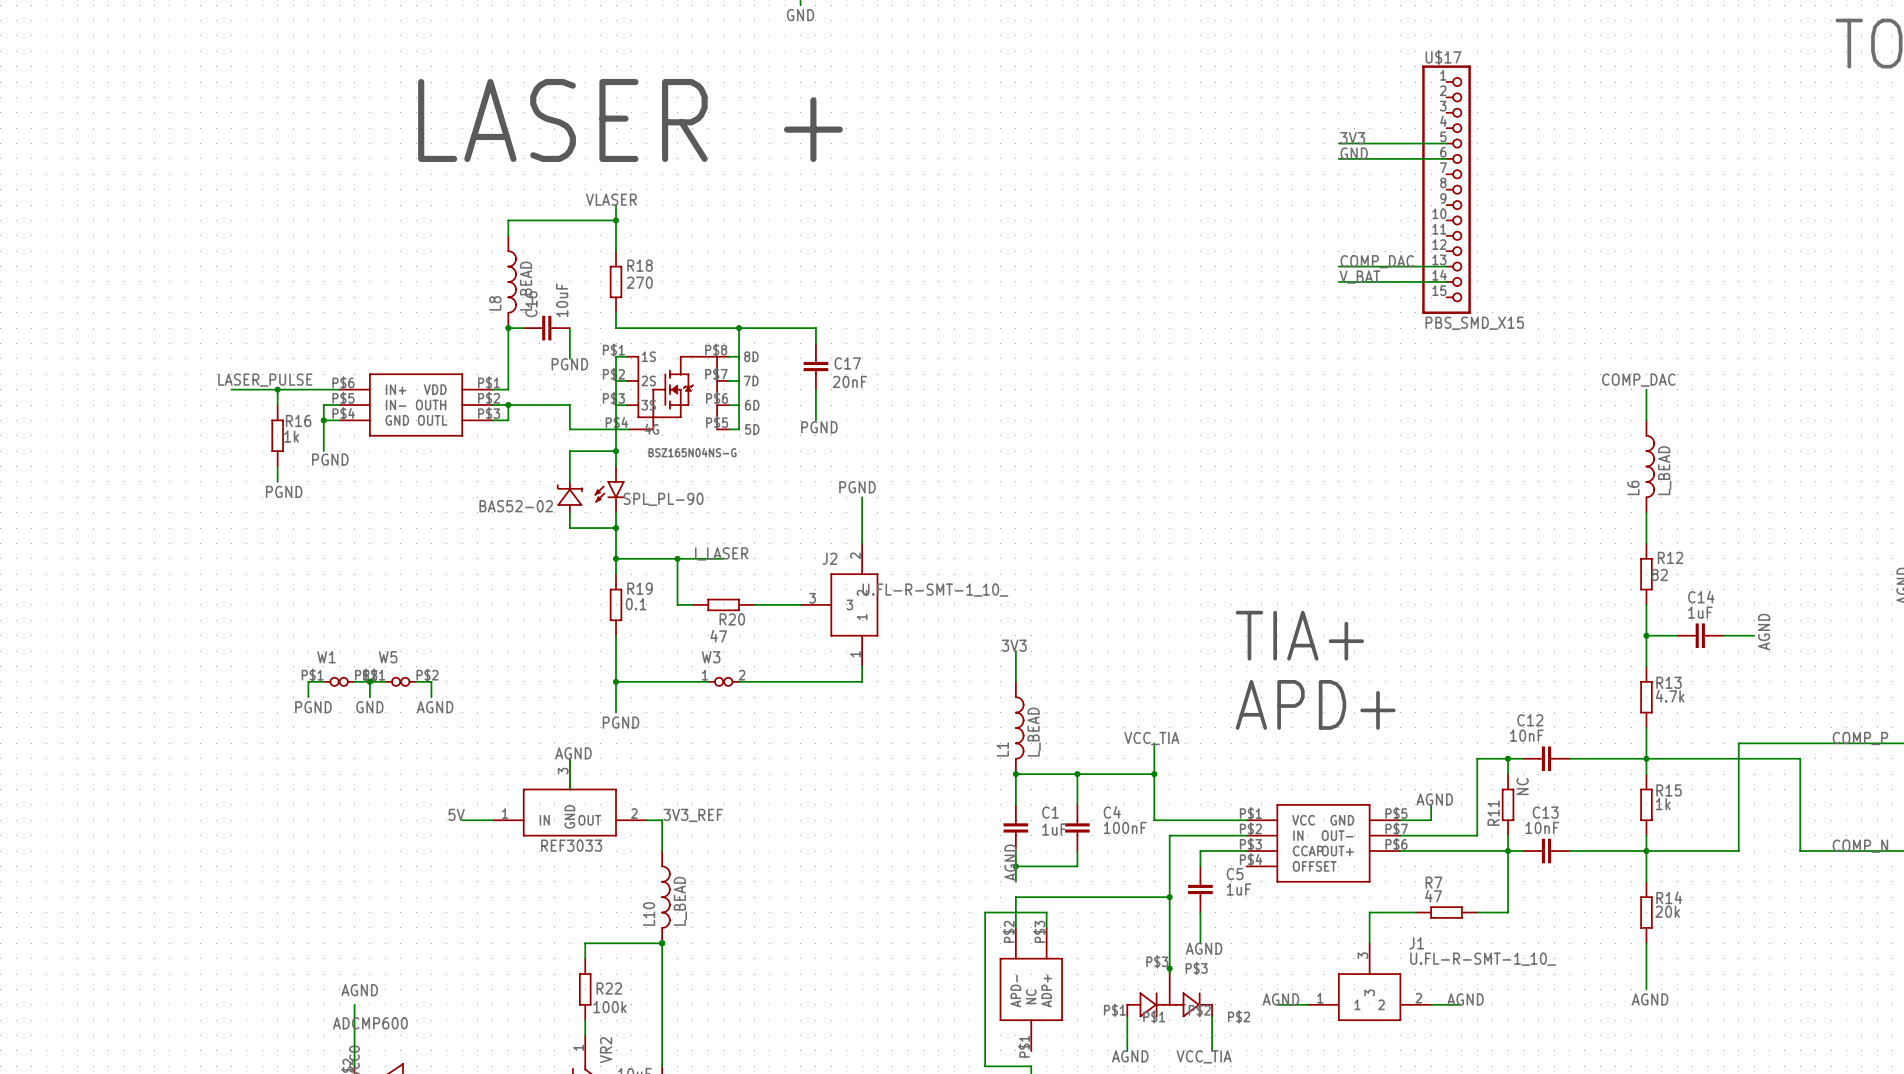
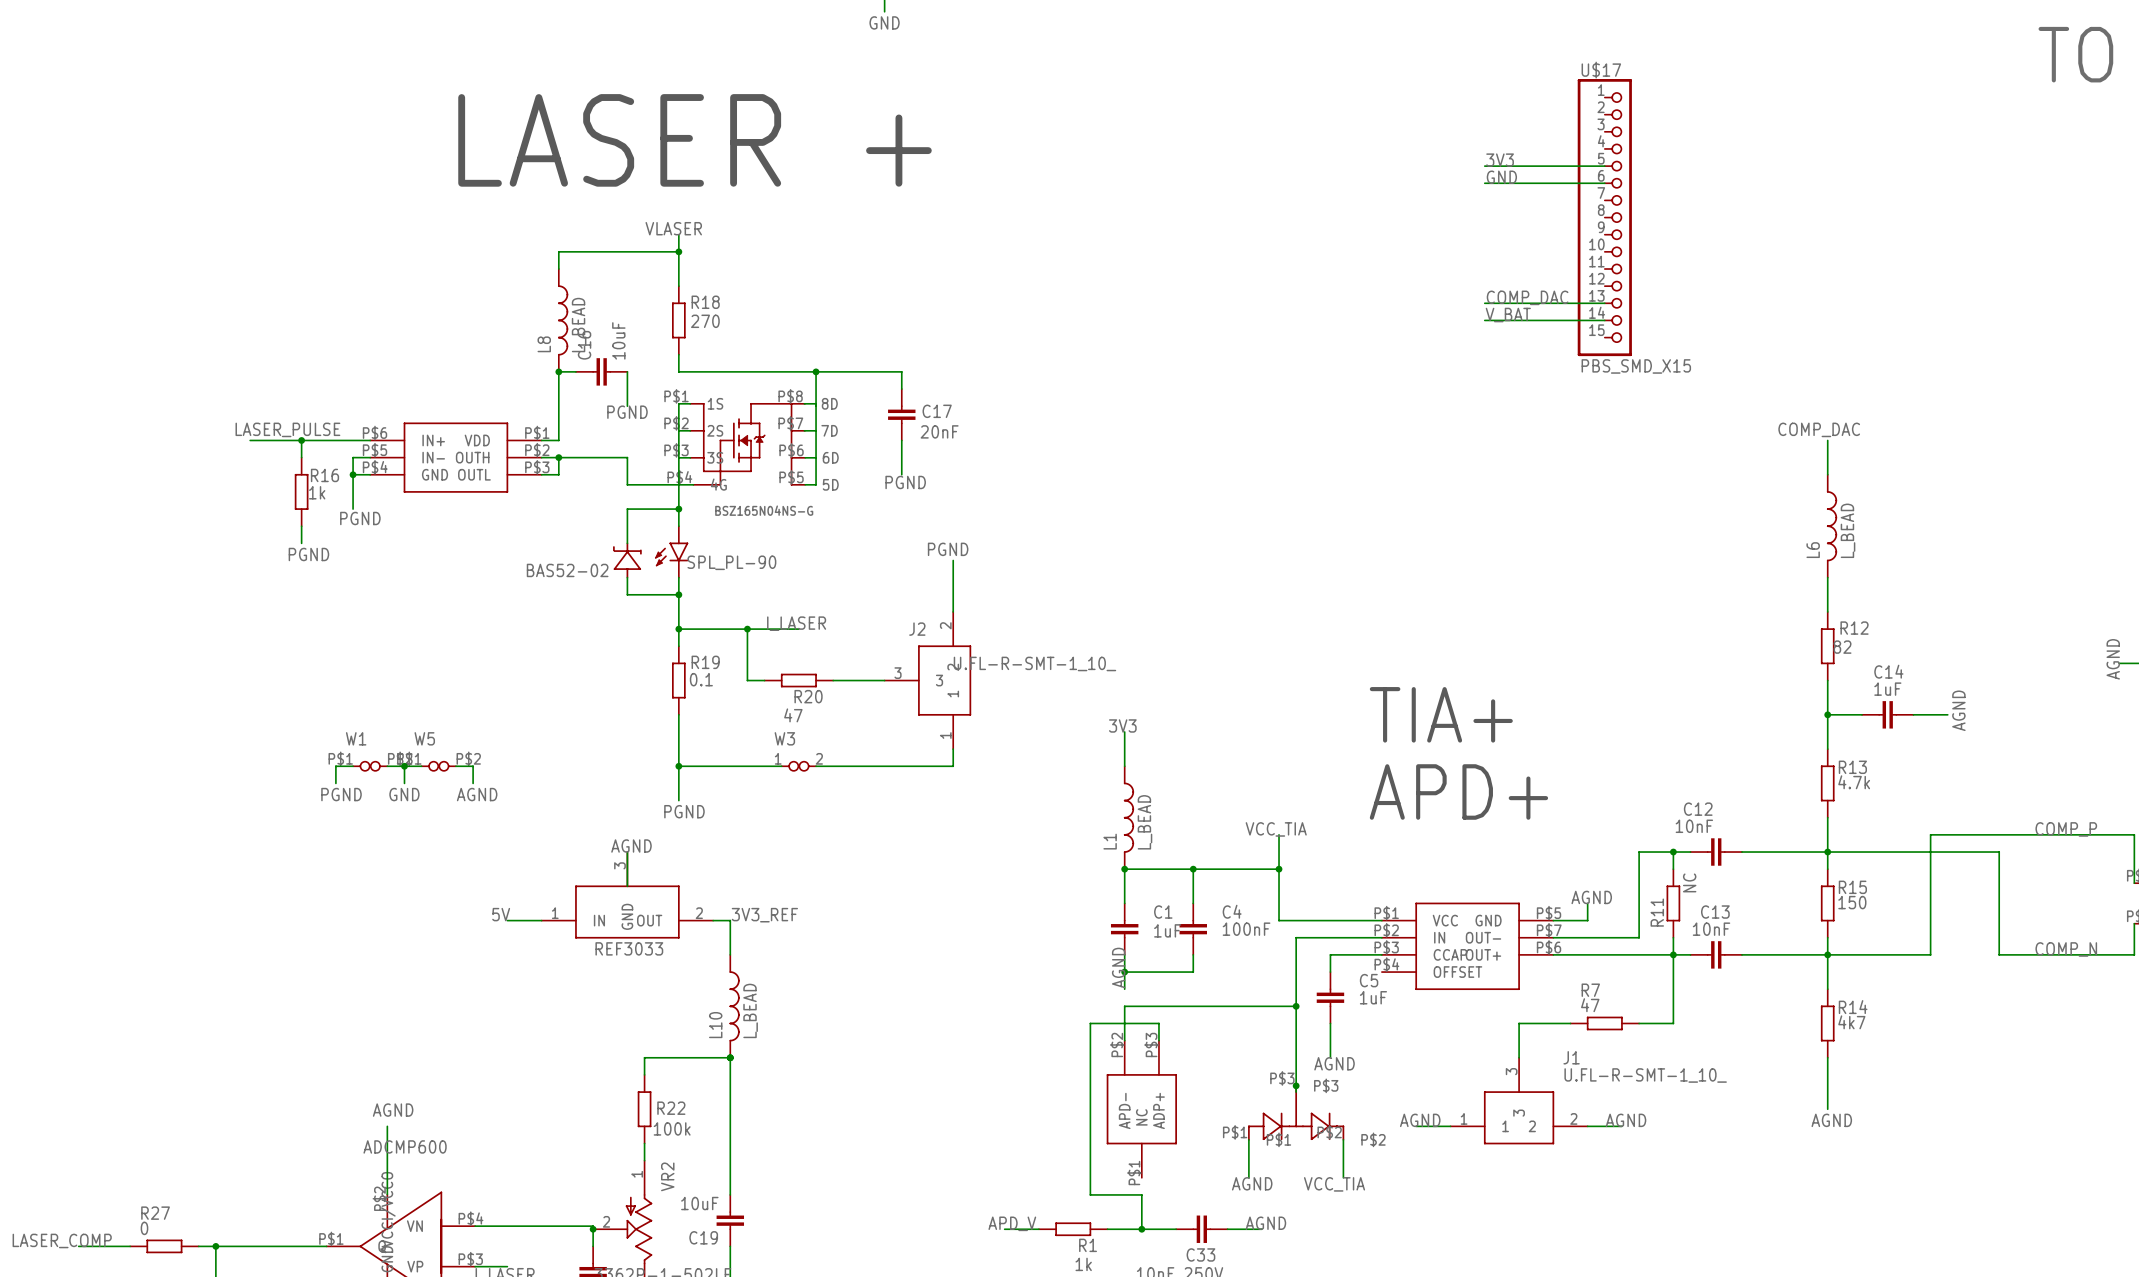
R15 value: 1k (1663, 804) -> 150 (1852, 902)
R14 value: 20k (1667, 911) -> 4k7 (1851, 1022)

